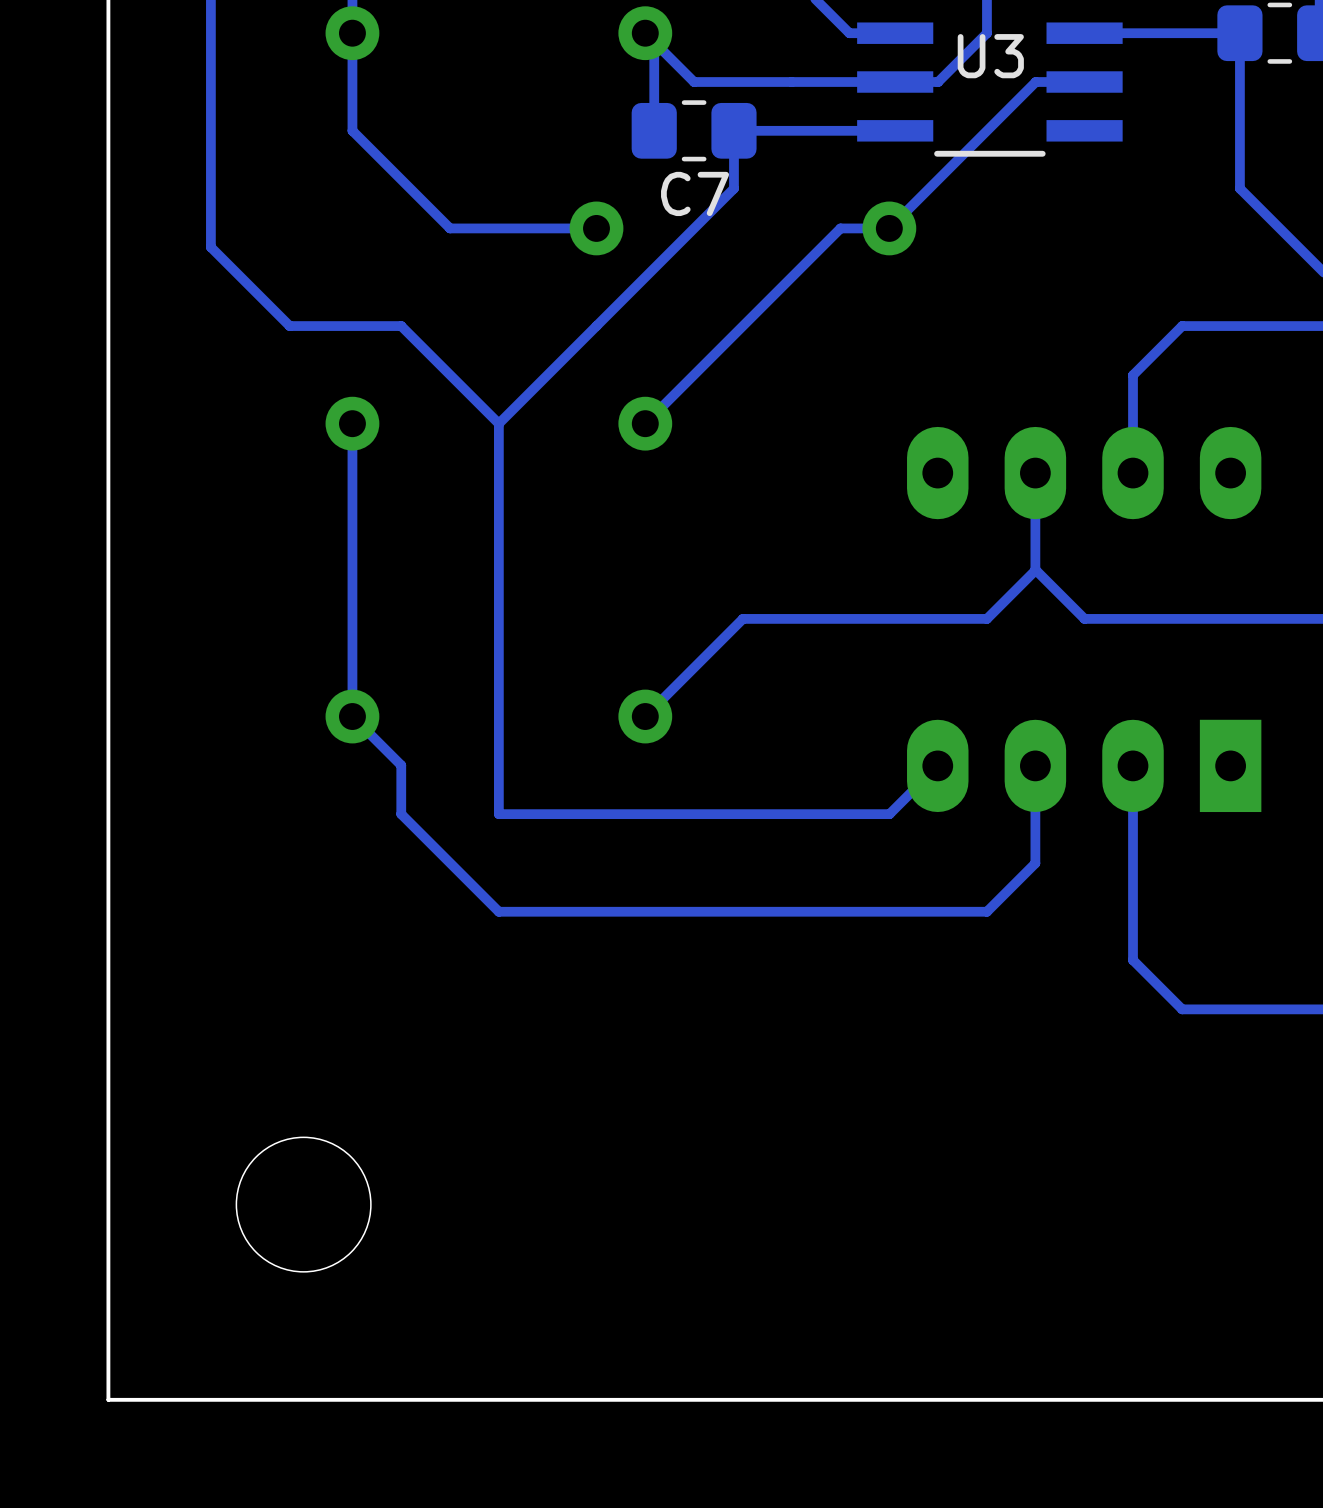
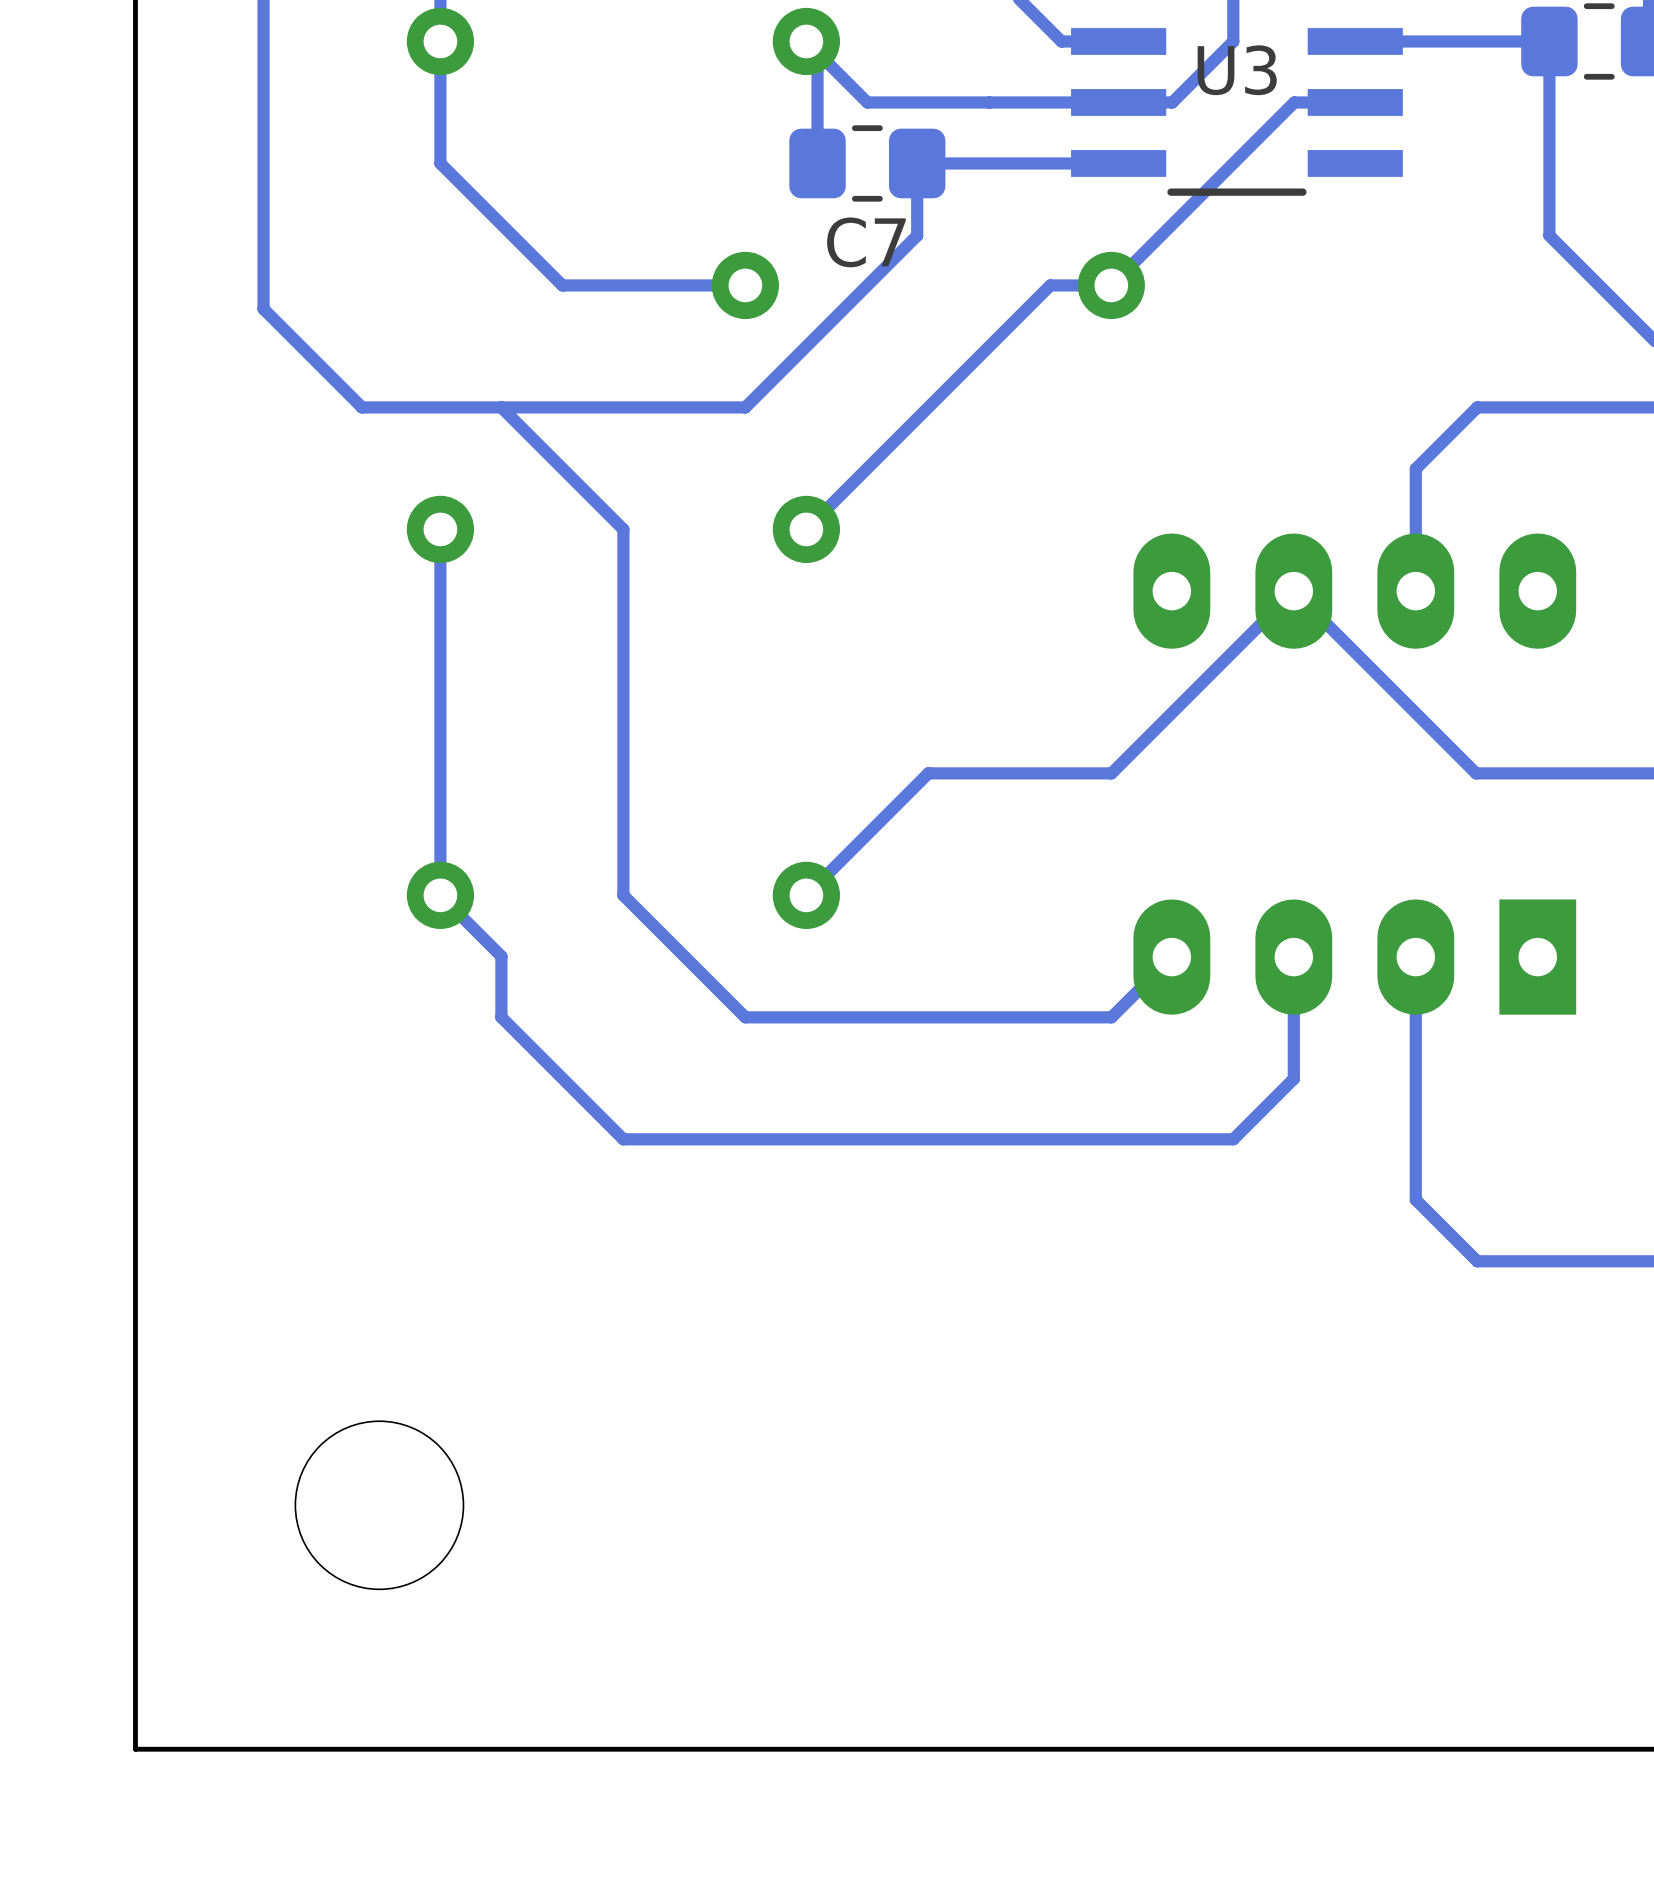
bottom track: (596, 326) (498, 423) -> (745, 407) (501, 407)
bottom track: (1035, 473) (1035, 570) (986, 618) (889, 618) -> none
bottom track: (1035, 569) (1084, 618) (1181, 618) -> (1111, 773) (1293, 591) (1476, 773)
bottom track: (498, 716) (498, 814) (596, 814) -> (623, 895) (745, 1017)

